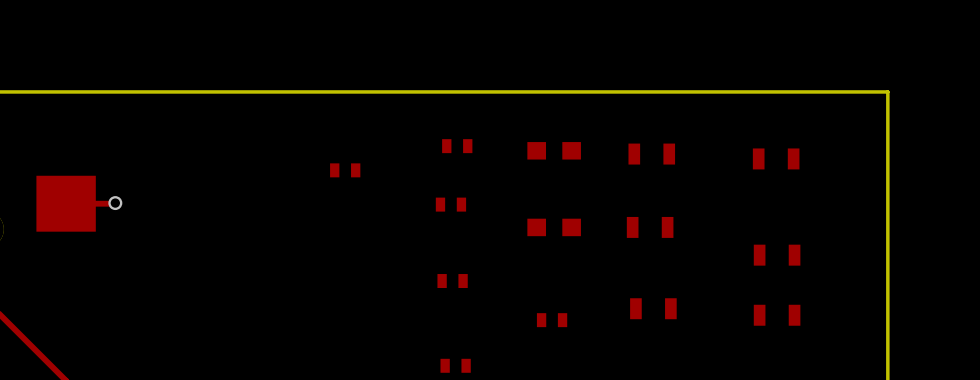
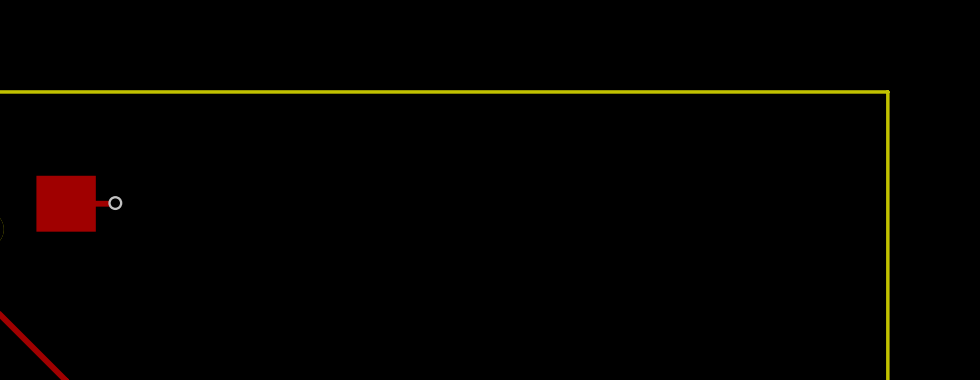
part: (457, 146) -> none
part: (554, 150) -> none
part: (651, 154) -> none
part: (776, 158) -> none
part: (345, 170) -> none
part: (450, 204) -> none
part: (554, 227) -> none
part: (650, 227) -> none
part: (777, 255) -> none
part: (452, 281) -> none
part: (653, 308) -> none
part: (777, 315) -> none
part: (552, 320) -> none
part: (455, 365) -> none

